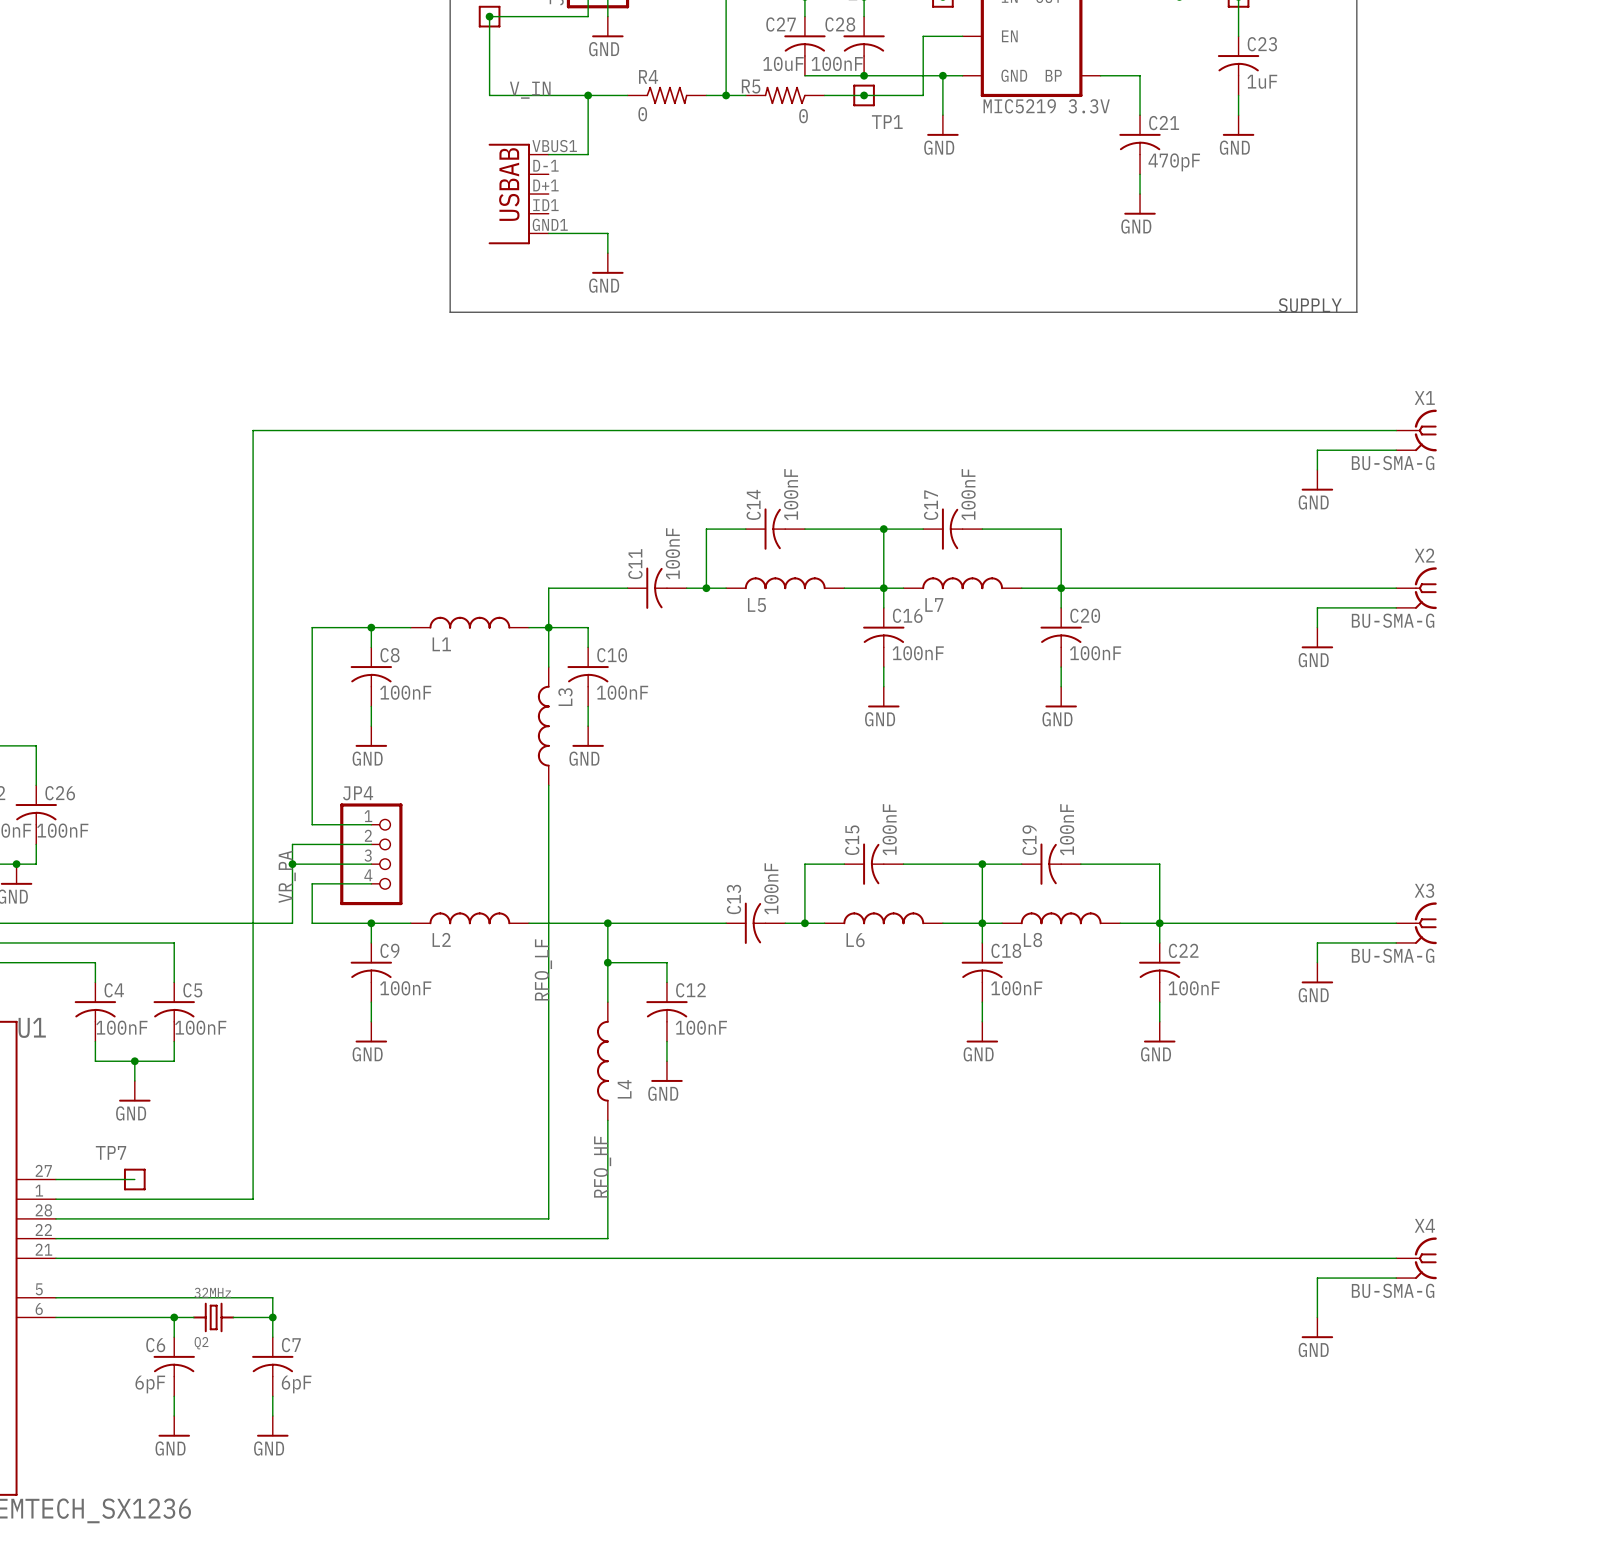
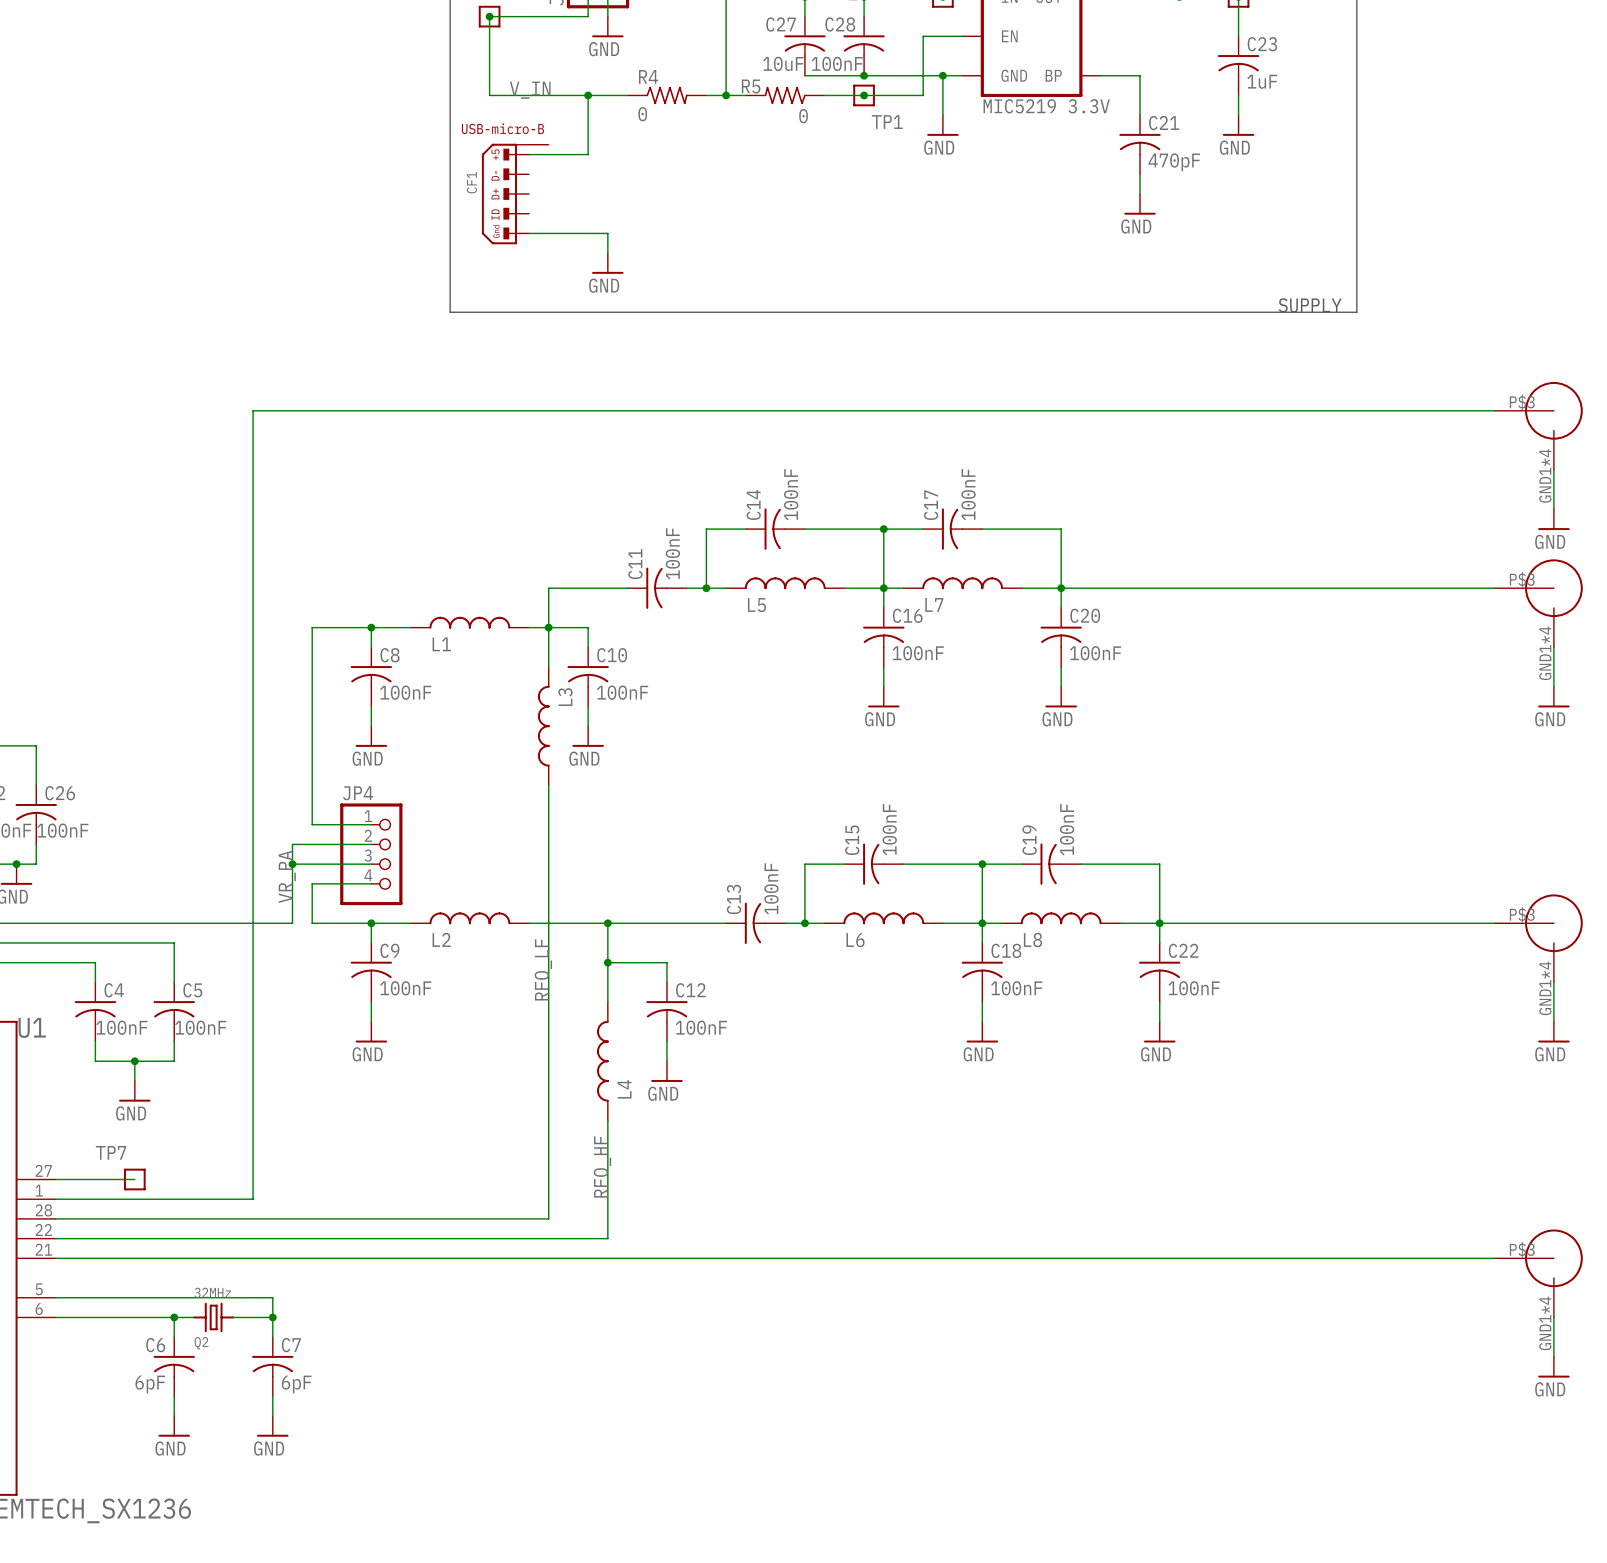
CF1: none -> (515, 194)
part: (518, 194) -> none
part: none -> (1538, 425)
wire: (253, 430) (1396, 430) -> (253, 430) (253, 410) (1494, 410)
X1: BU-SMA-G (1416, 430) -> none
wire: (1396, 450) (1317, 450) (1317, 469) -> none
wire: none -> (1553, 469) (1553, 509)
power symbol: GND (1317, 480) -> none
power symbol: none -> GND (1553, 519)
wire: none -> (1396, 588) (1494, 588)
X2: BU-SMA-G (1416, 588) -> none
part: none -> (1538, 603)
wire: (1396, 607) (1317, 607) (1317, 627) -> none
power symbol: GND (1317, 637) -> none
wire: none -> (1553, 647) (1553, 686)
power symbol: none -> GND (1553, 697)
wire: none -> (1396, 923) (1494, 923)
X3: BU-SMA-G (1416, 923) -> none
part: none -> (1538, 938)
wire: (1396, 942) (1317, 942) (1317, 962) -> none
power symbol: GND (1317, 973) -> none
wire: none -> (1553, 982) (1553, 1021)
power symbol: none -> GND (1553, 1032)
wire: none -> (1396, 1258) (1494, 1258)
X4: BU-SMA-G (1416, 1258) -> none
part: none -> (1538, 1273)
wire: (1396, 1278) (1317, 1278) (1317, 1317) -> none
wire: none -> (1553, 1317) (1553, 1356)
power symbol: GND (1317, 1327) -> none
power symbol: none -> GND (1553, 1367)

